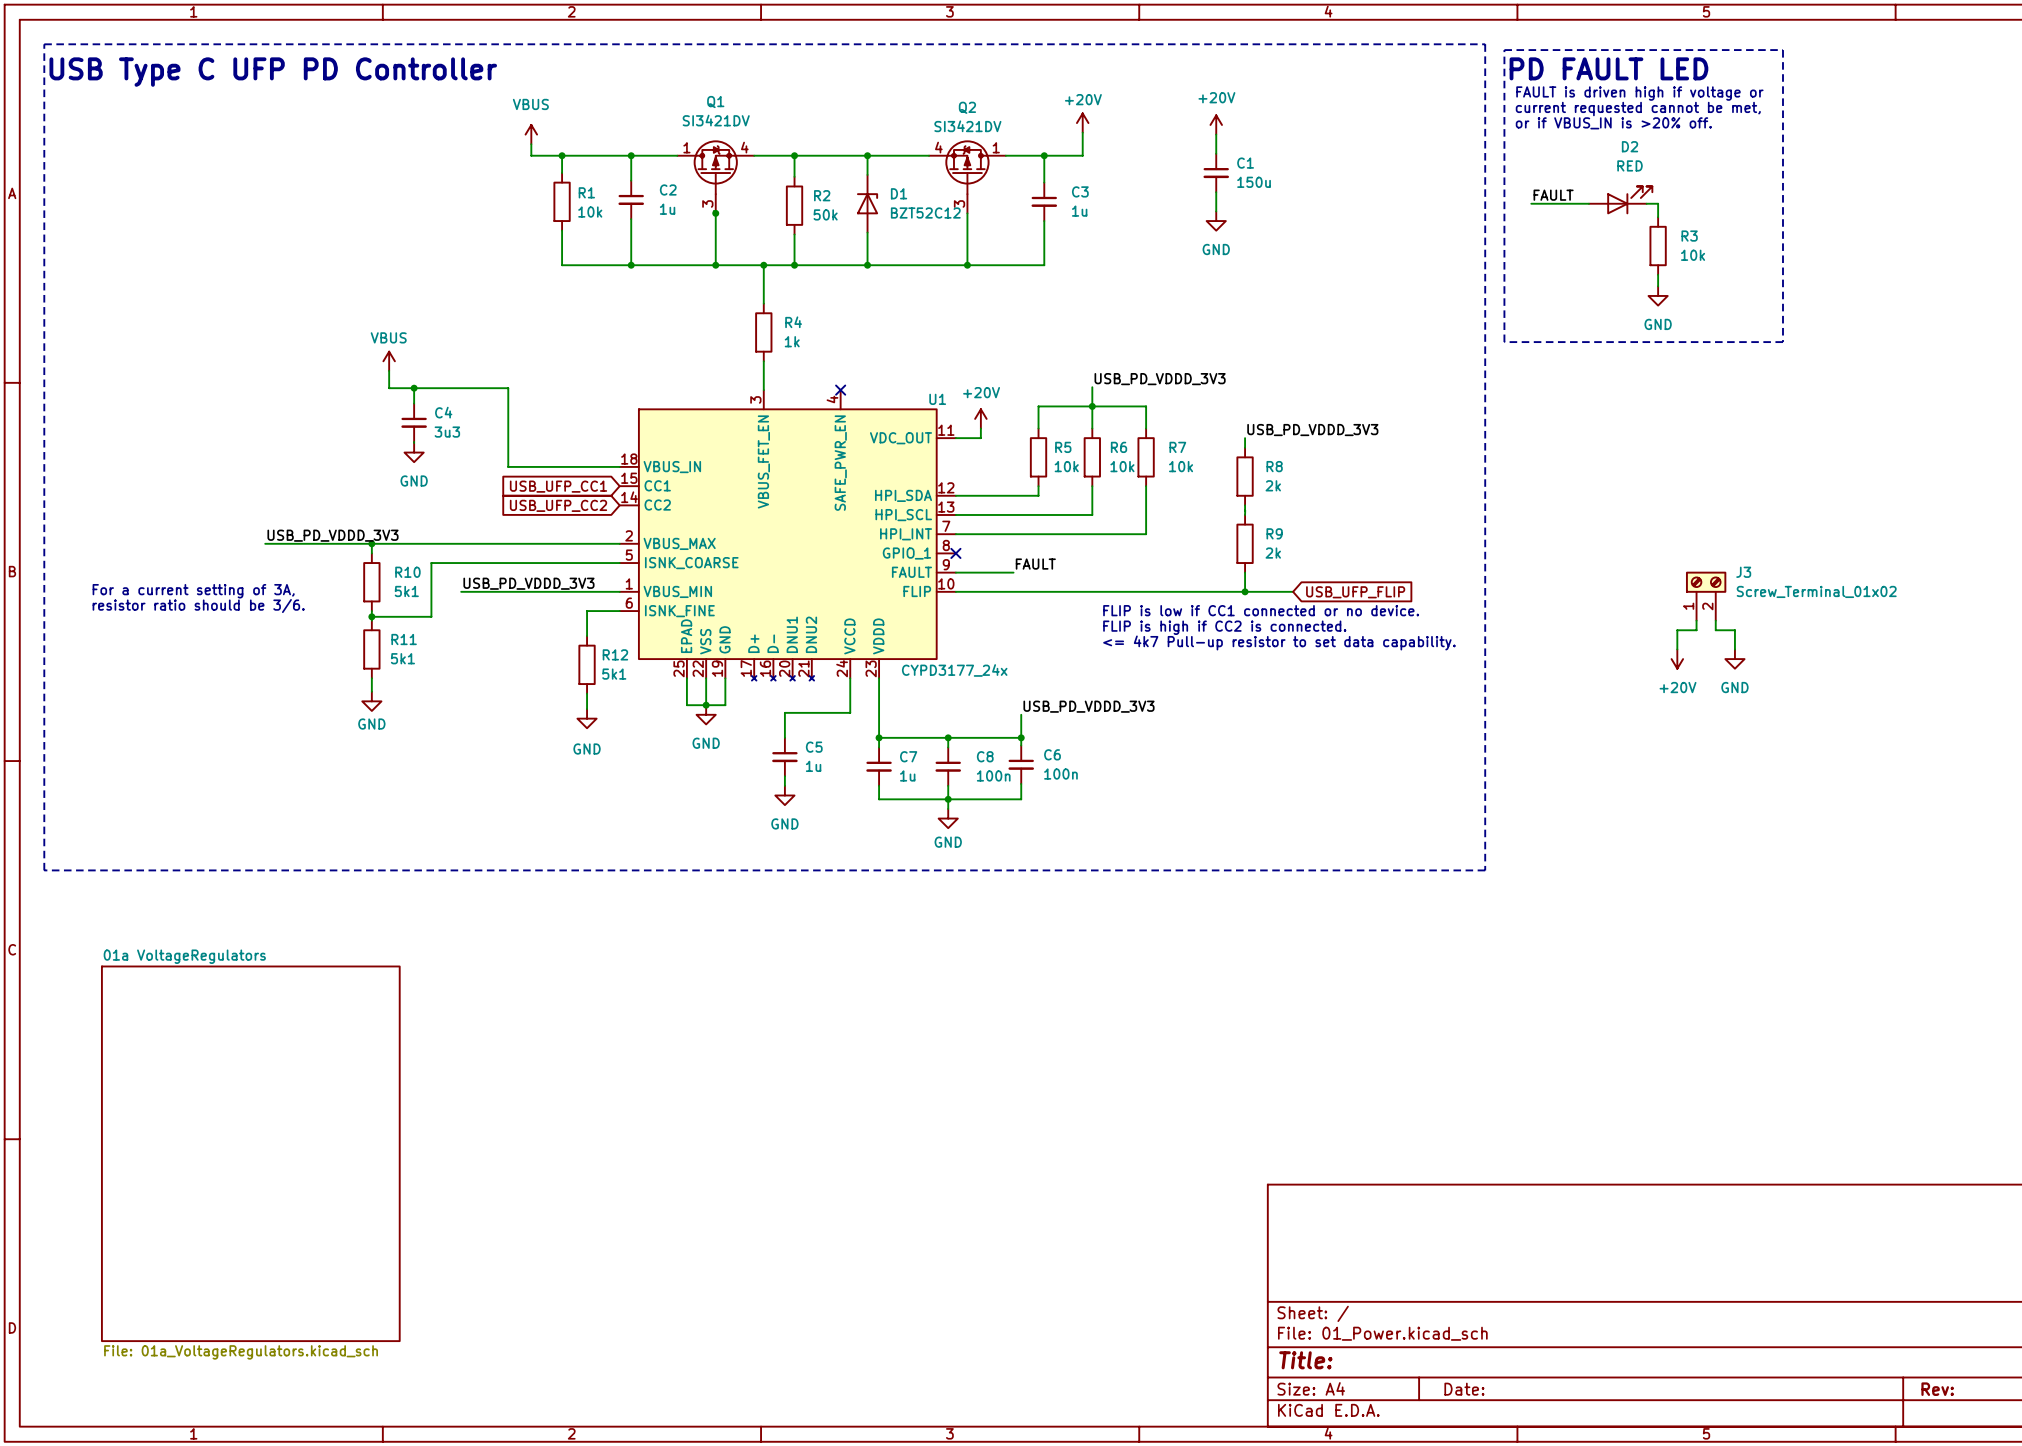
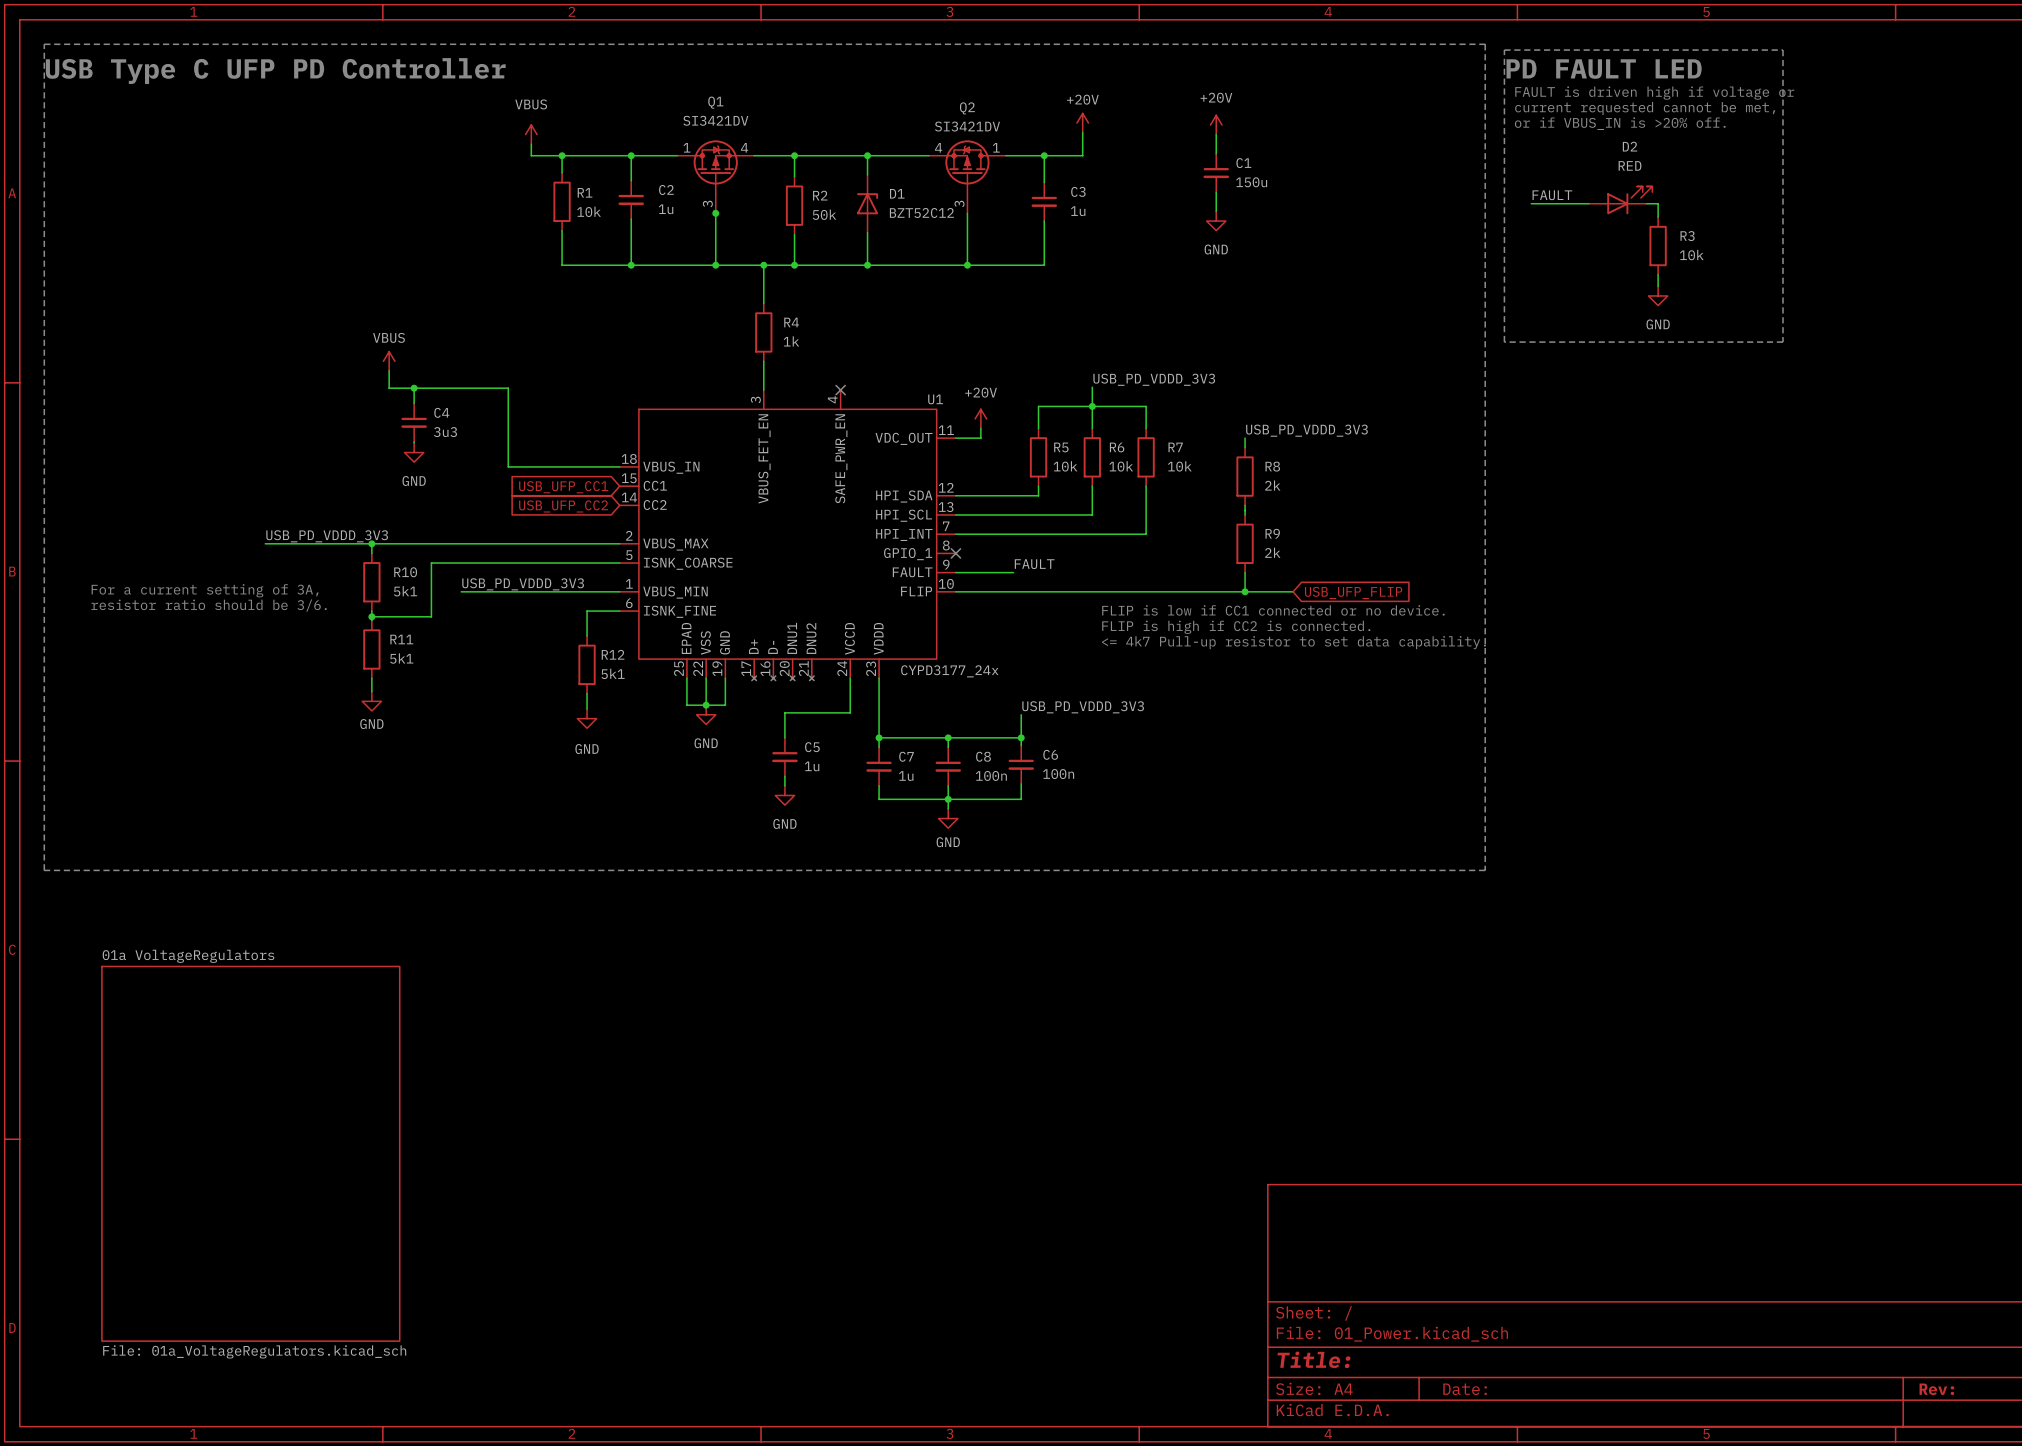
J3: Screw_Terminal_01x02 (1706, 596) -> none
wire: (1696, 620) (1696, 630) (1677, 630) (1677, 649) -> none
wire: (1715, 620) (1715, 630) (1734, 630) (1734, 649) -> none
power symbol: +20V (1677, 659) -> none
power symbol: GND (1734, 659) -> none

